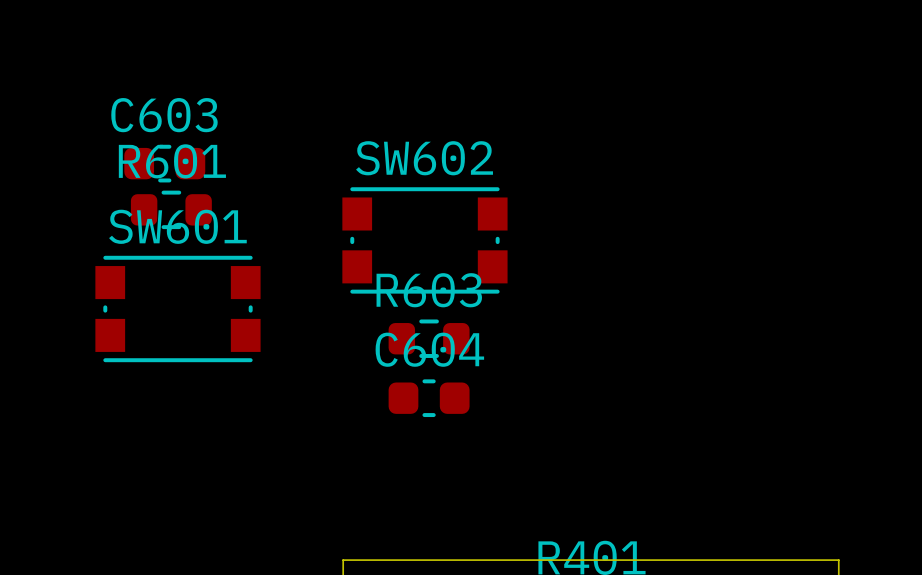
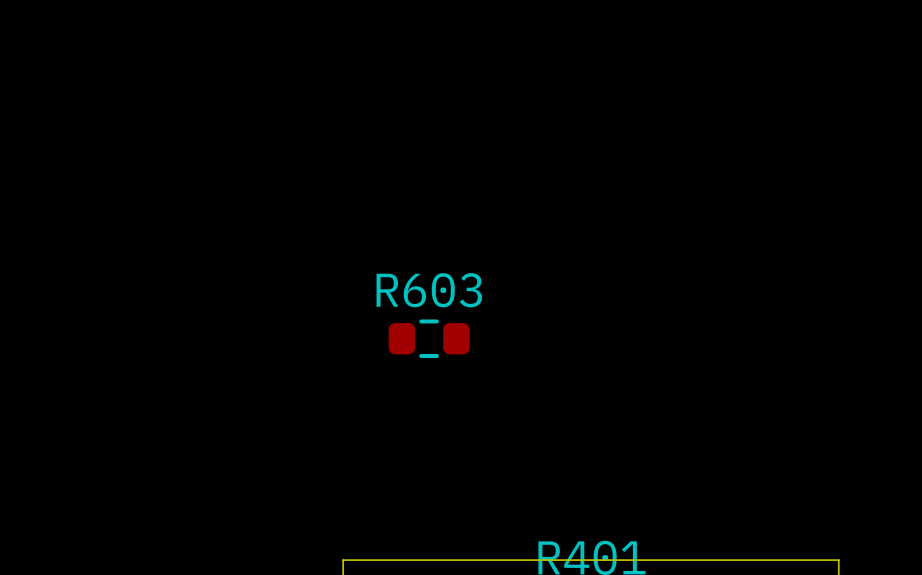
C603: (164, 163) -> none
R601: (171, 209) -> none
SW602: (424, 240) -> none
SW601: (177, 308) -> none
C604: (429, 398) -> none

